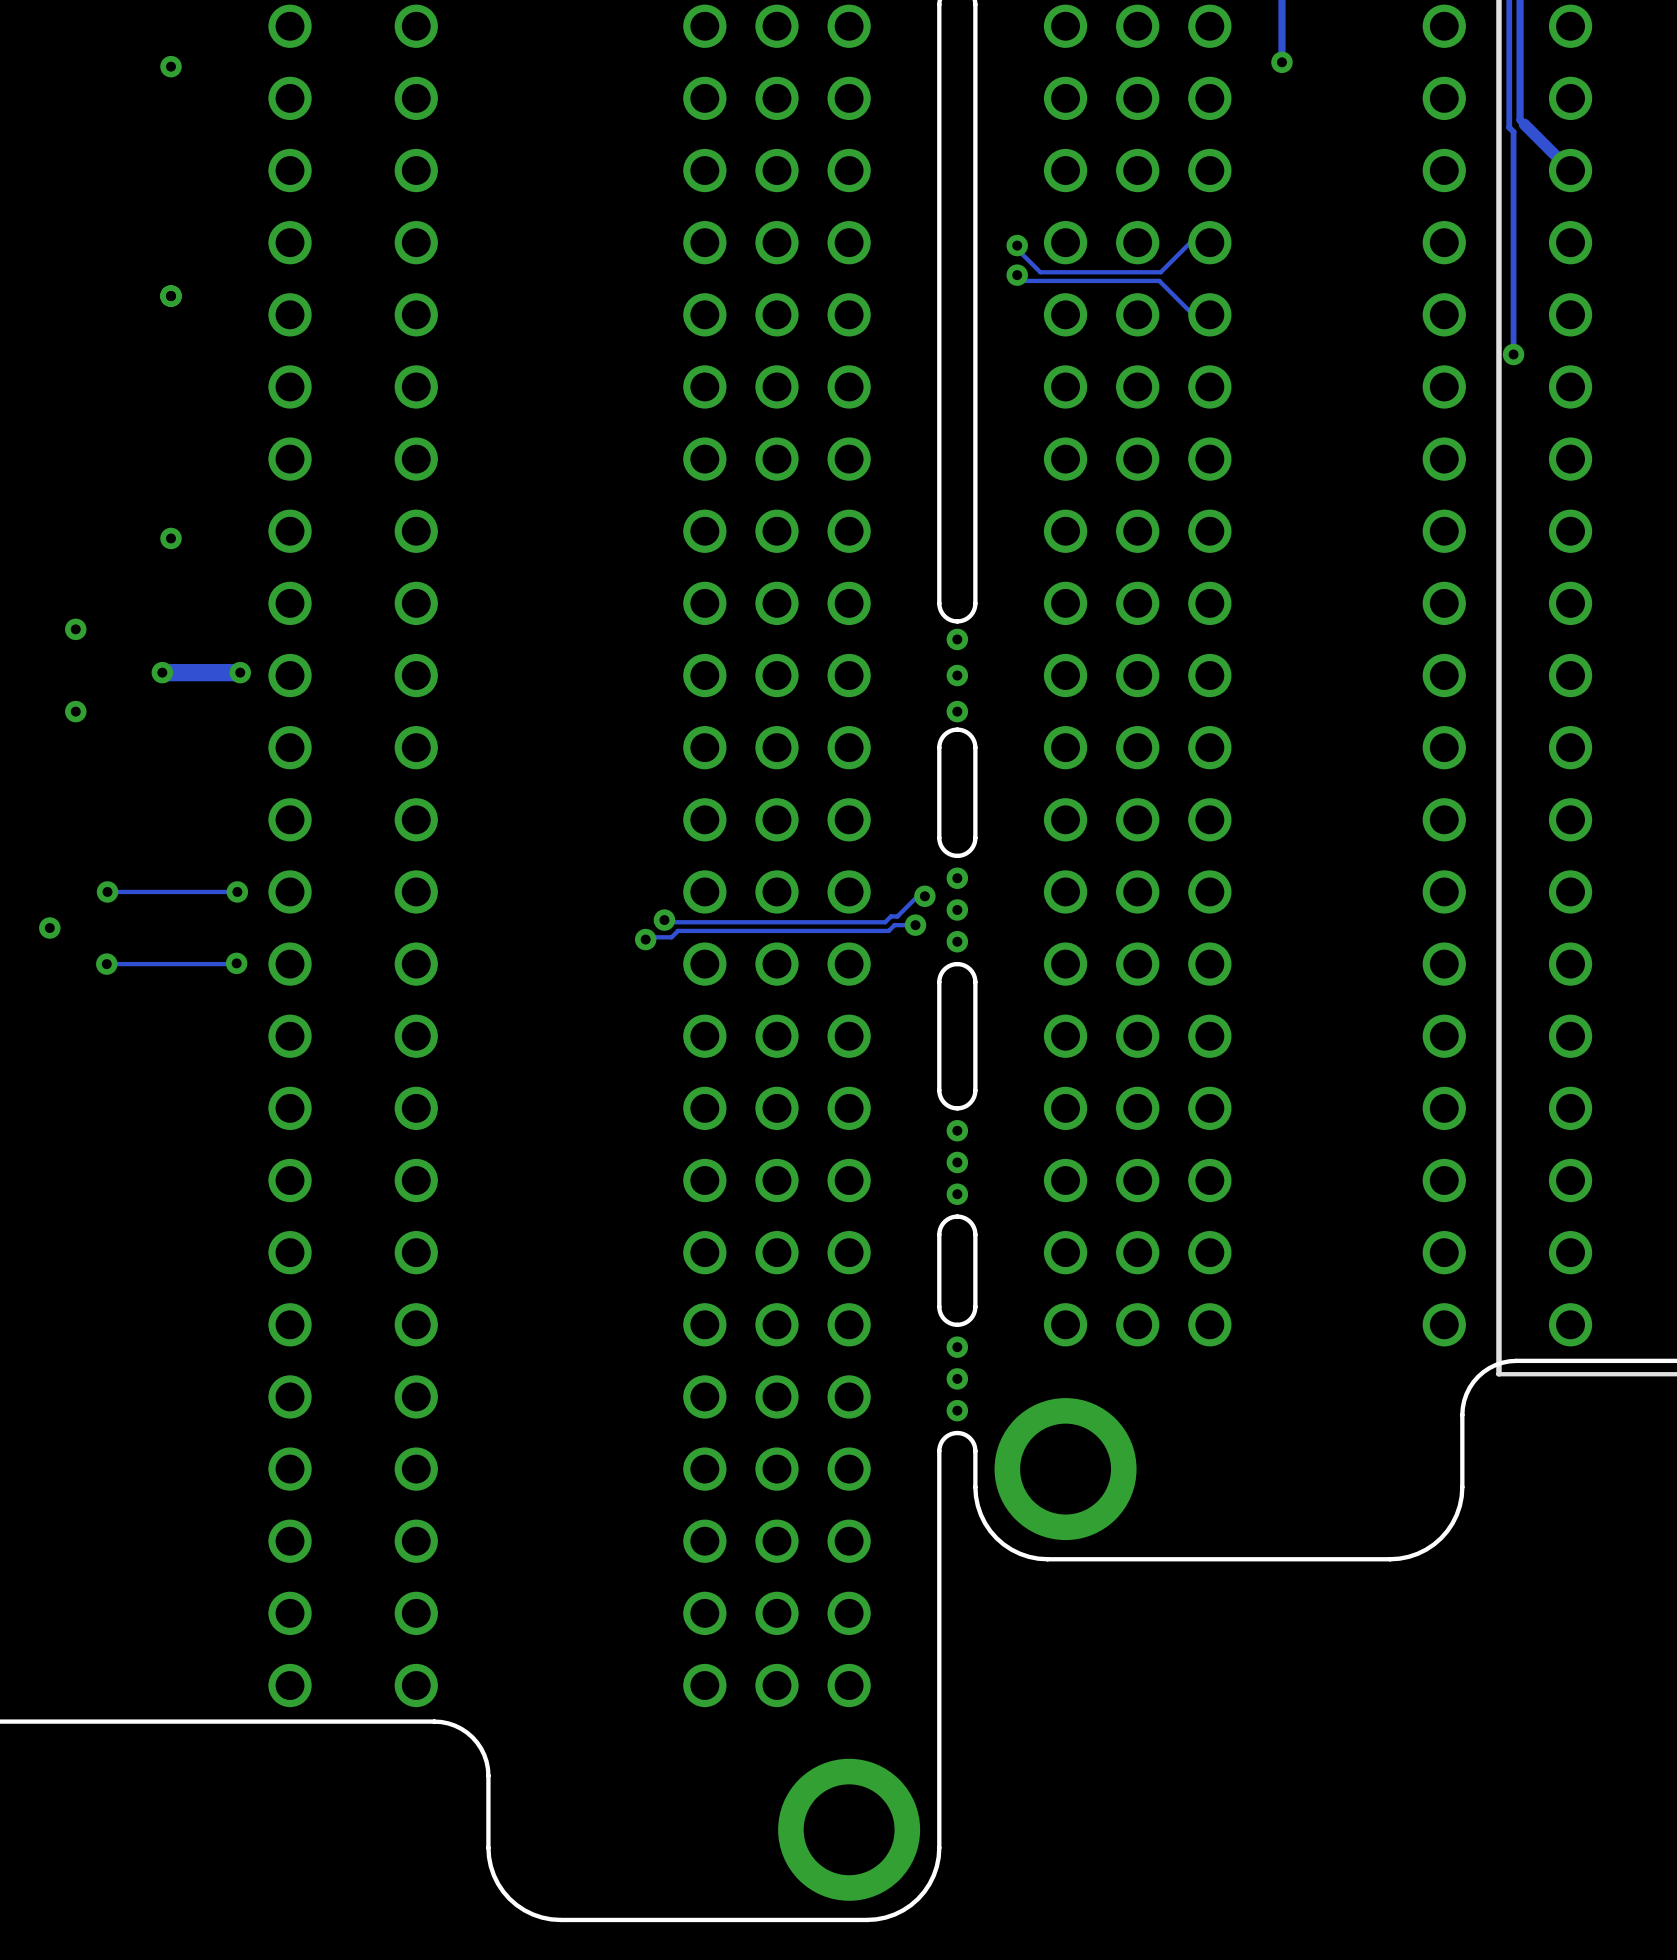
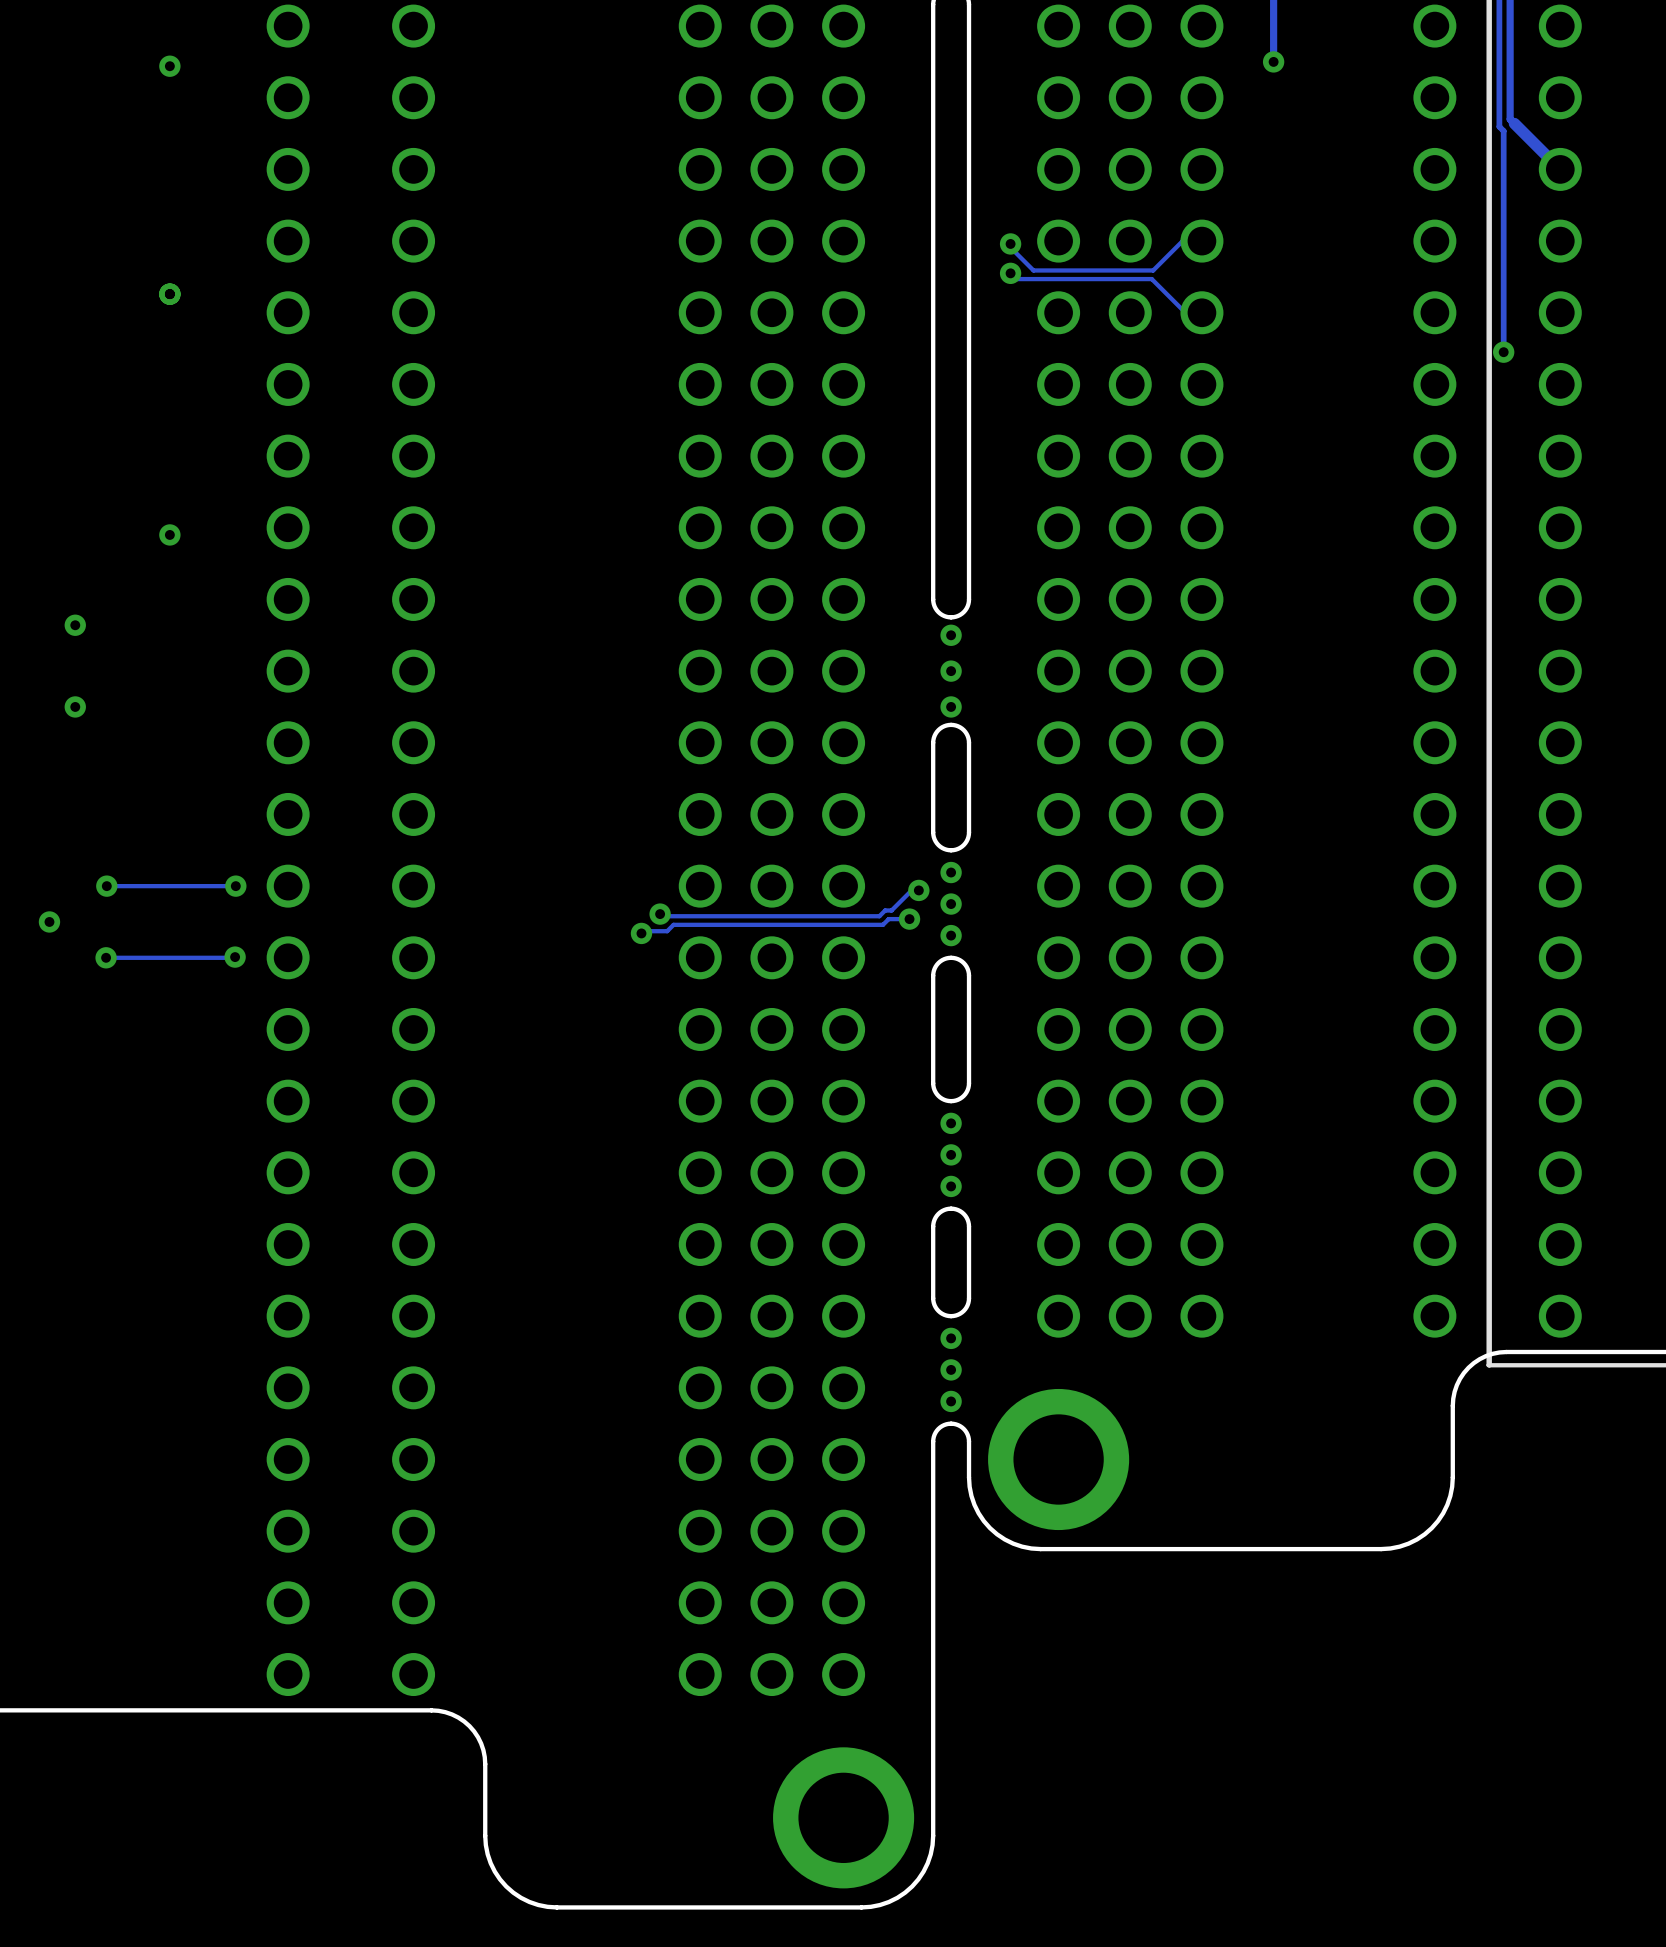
via: (162, 672) -> none
track: (240, 672) (162, 672) -> none
via: (240, 672) -> none

